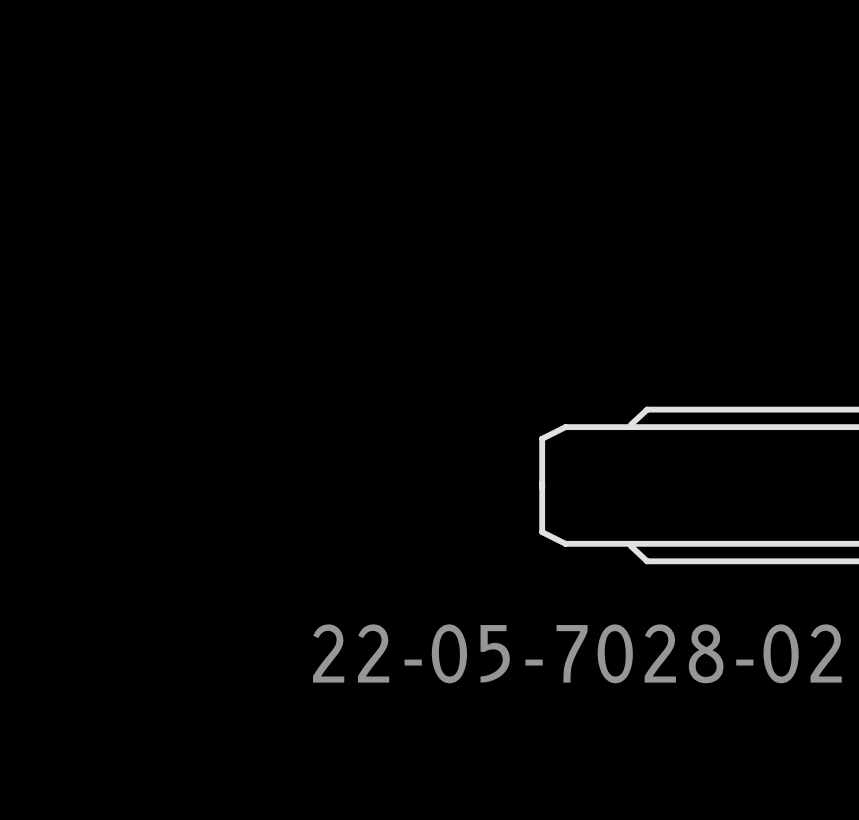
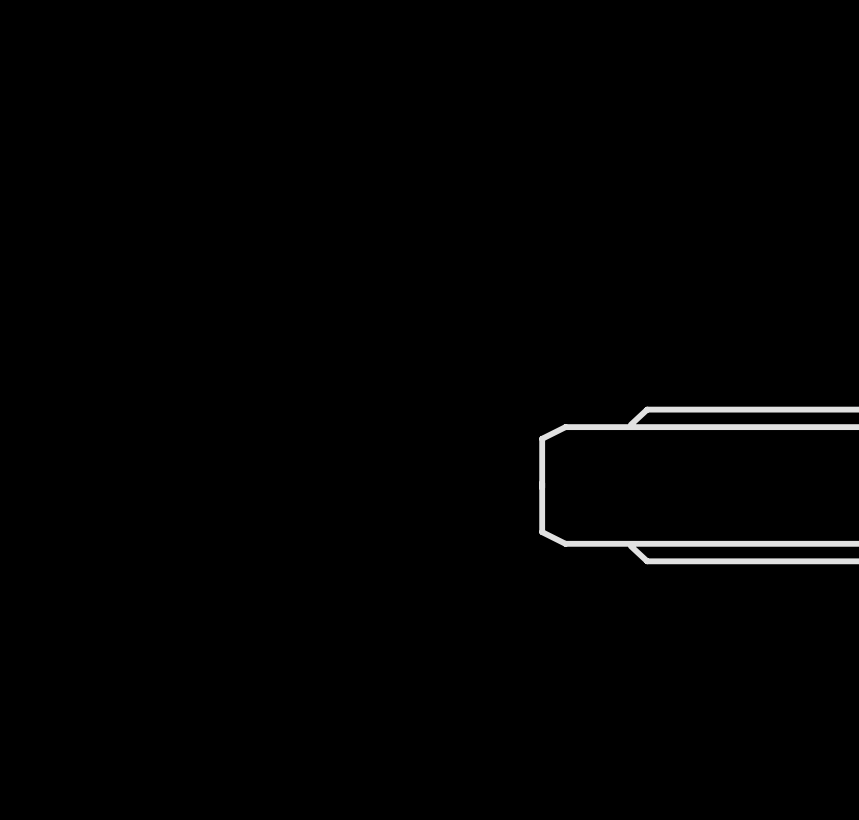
part value: 22-05-7028-02 (577, 653) -> none

